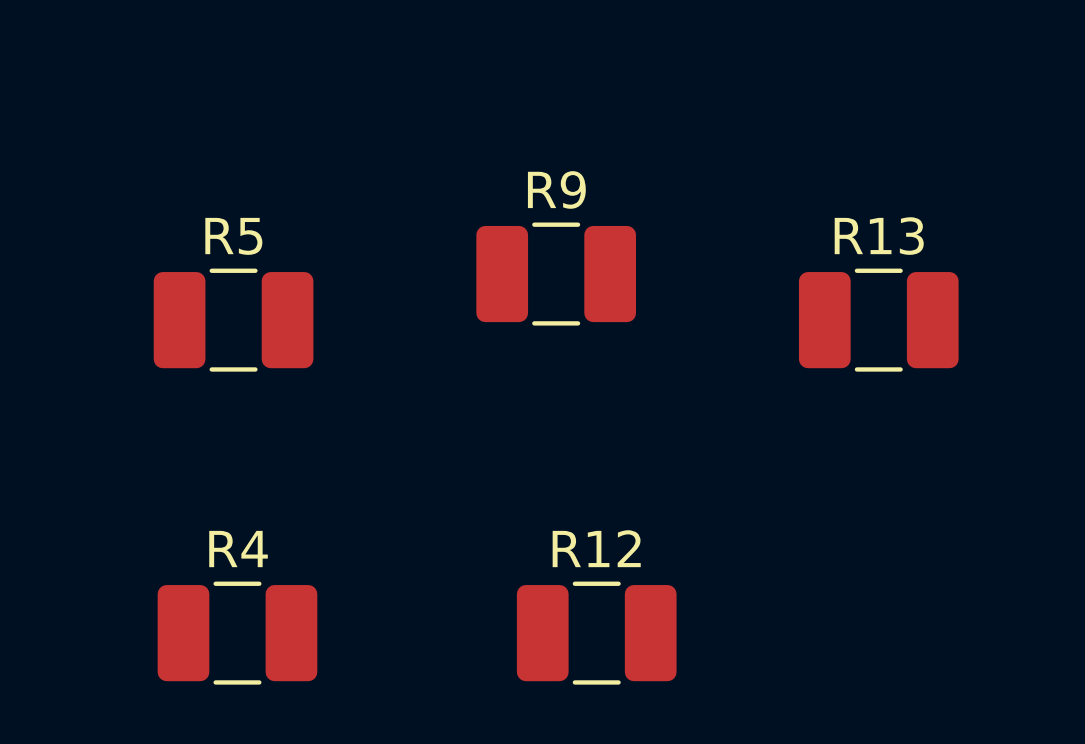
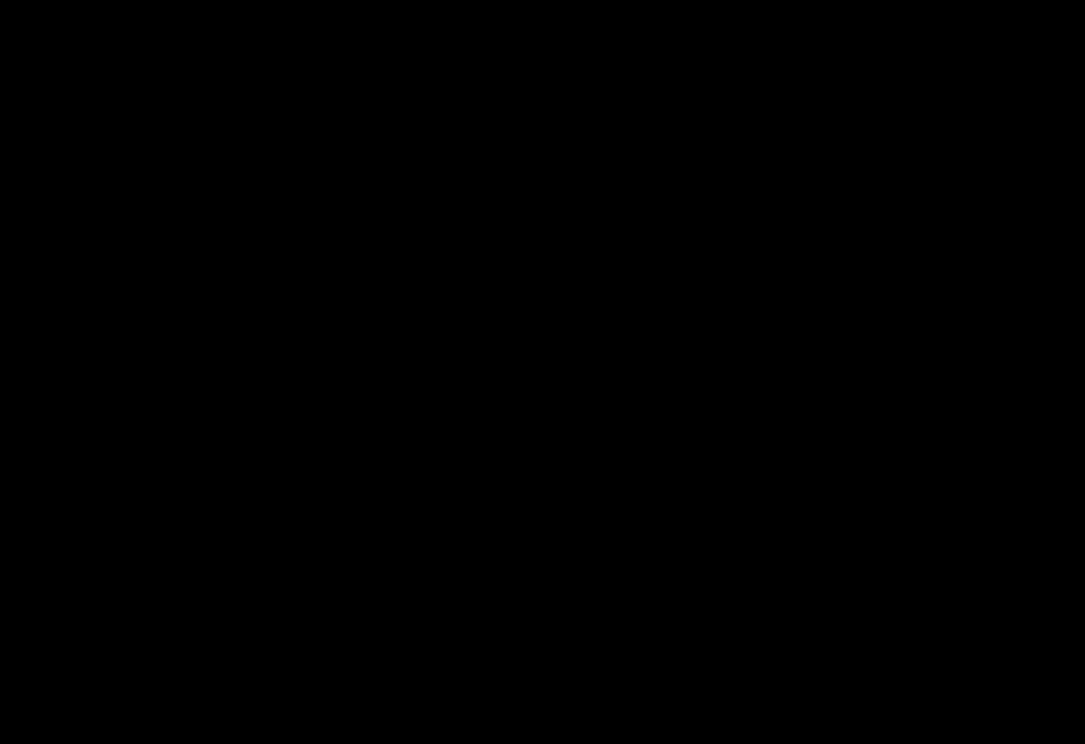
R9: (556, 274) -> none
R5: (233, 320) -> none
R13: (878, 320) -> none
R4: (237, 633) -> none
R12: (596, 633) -> none

